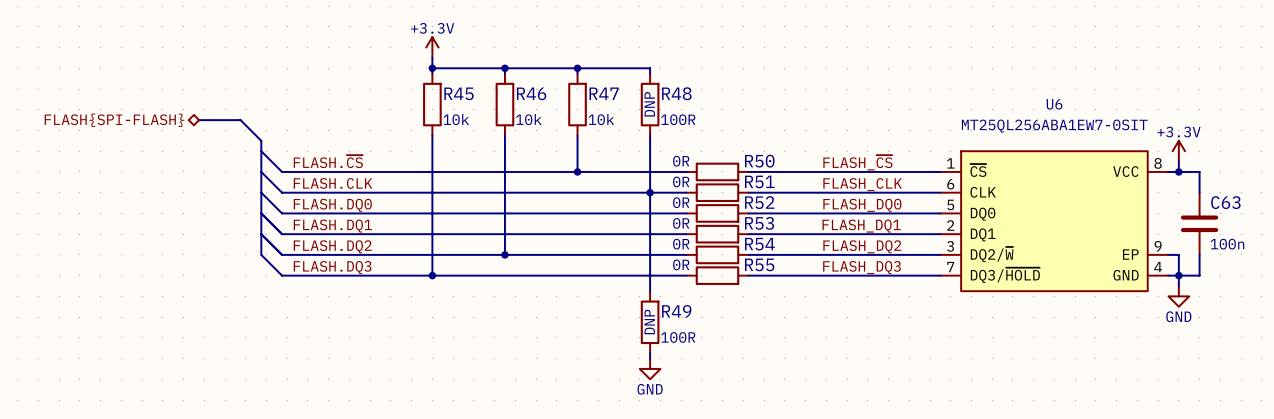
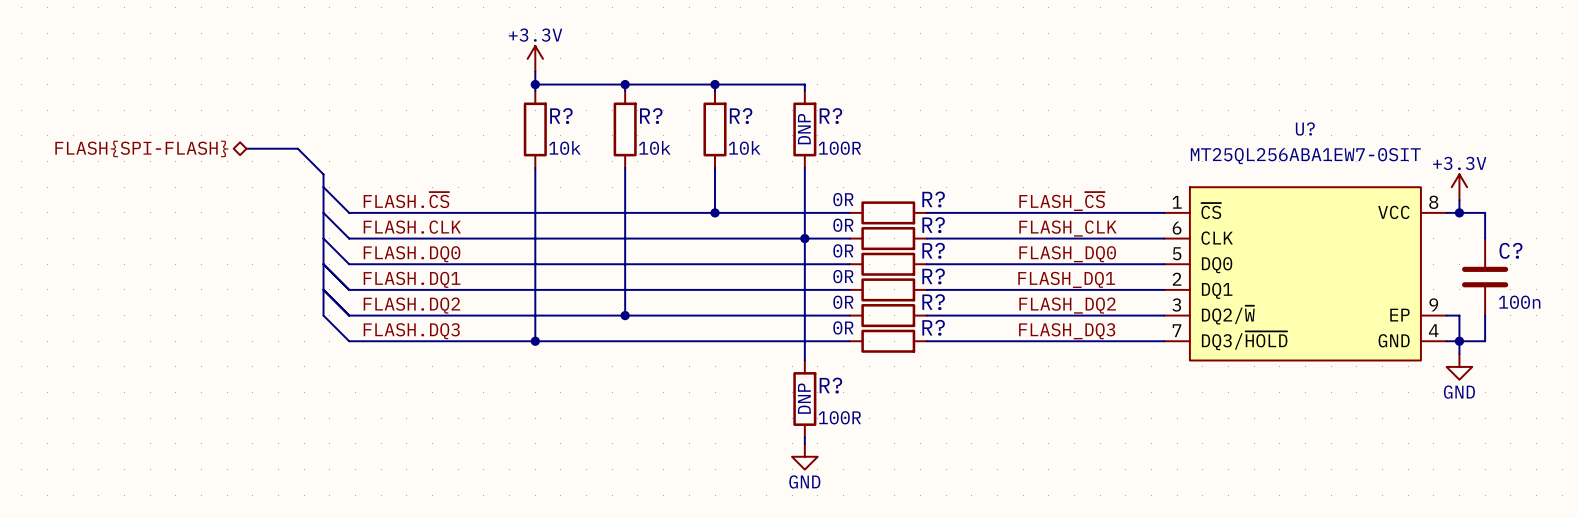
R45 name: R45 (459, 93) -> R? (561, 116)
R46 name: R46 (531, 93) -> R? (651, 116)
R47 name: R47 (604, 93) -> R? (741, 116)
R48 name: R48 (676, 93) -> R? (830, 116)
U6 name: U6 (1054, 104) -> U? (1305, 128)
R50 name: R50 (759, 161) -> R? (933, 199)
R51 name: R51 (759, 181) -> R? (933, 225)
R52 name: R52 (759, 202) -> R? (933, 250)
C63 name: C63 (1225, 202) -> C? (1510, 250)
R53 name: R53 (759, 223) -> R? (933, 276)
R54 name: R54 (759, 244) -> R? (933, 302)
R55 name: R55 (759, 264) -> R? (933, 327)
R49 name: R49 (676, 311) -> R? (830, 385)

